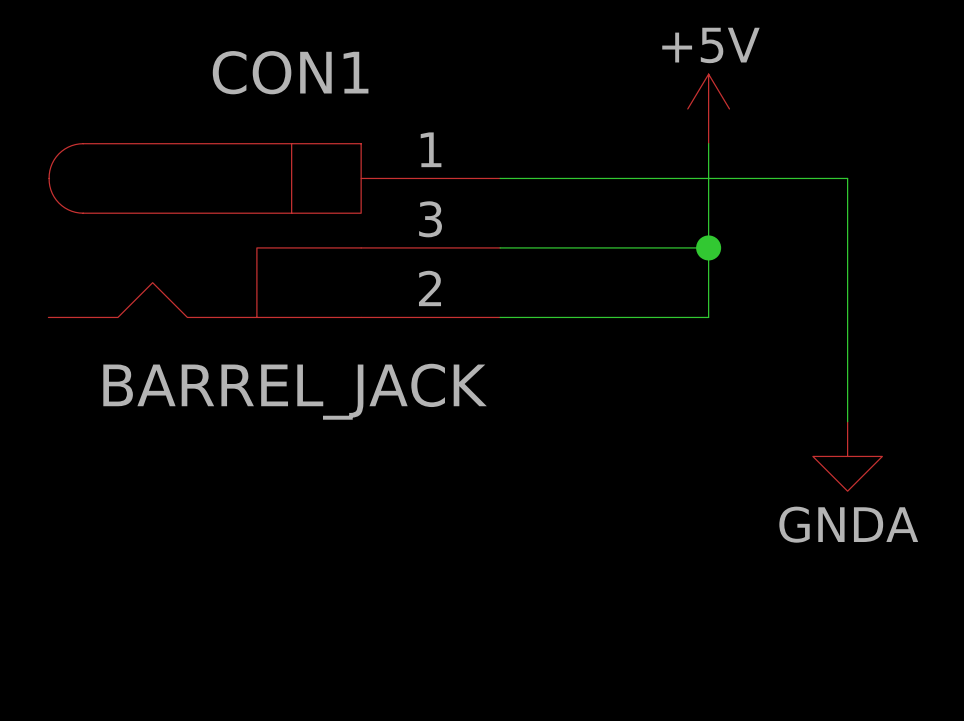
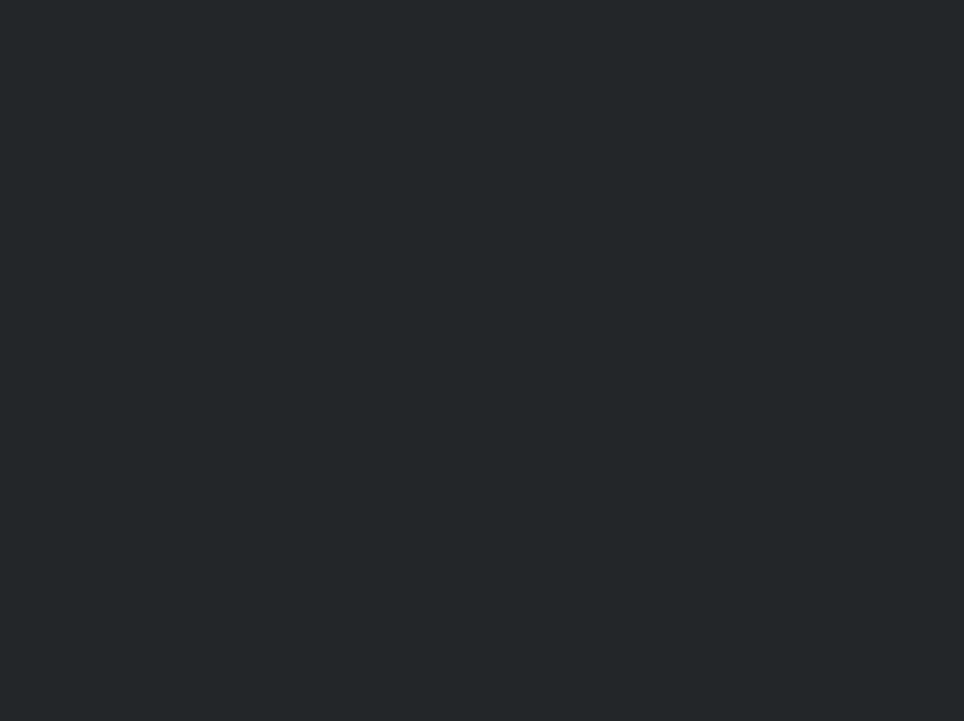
power symbol: +5V (708, 108) -> none
wire: (708, 143) (708, 317) (500, 317) -> none
wire: (500, 178) (847, 178) (847, 421) -> none
CON1: BARREL_JACK (274, 230) -> none
wire: (500, 247) (708, 247) -> none
junction: (708, 247) -> none
power symbol: GNDA (847, 456) -> none

